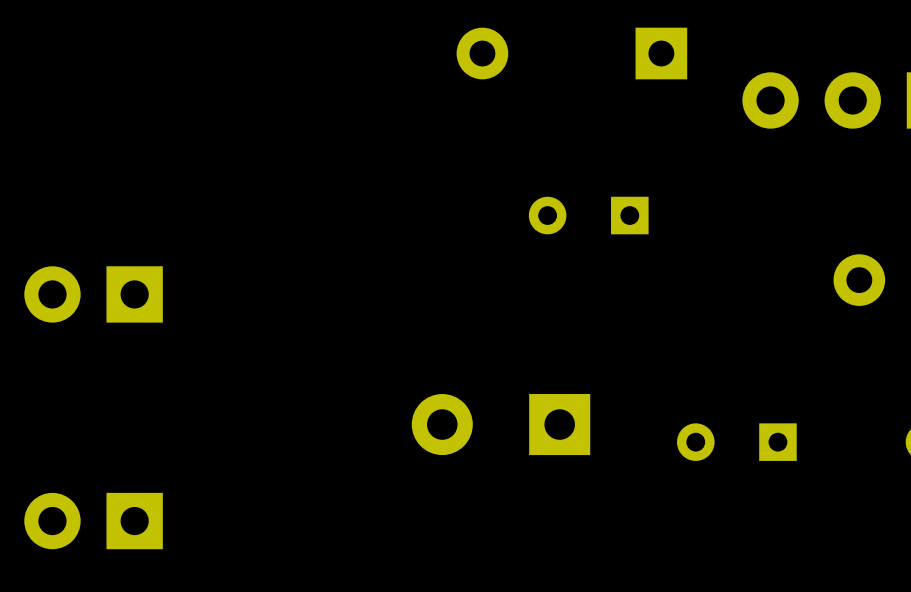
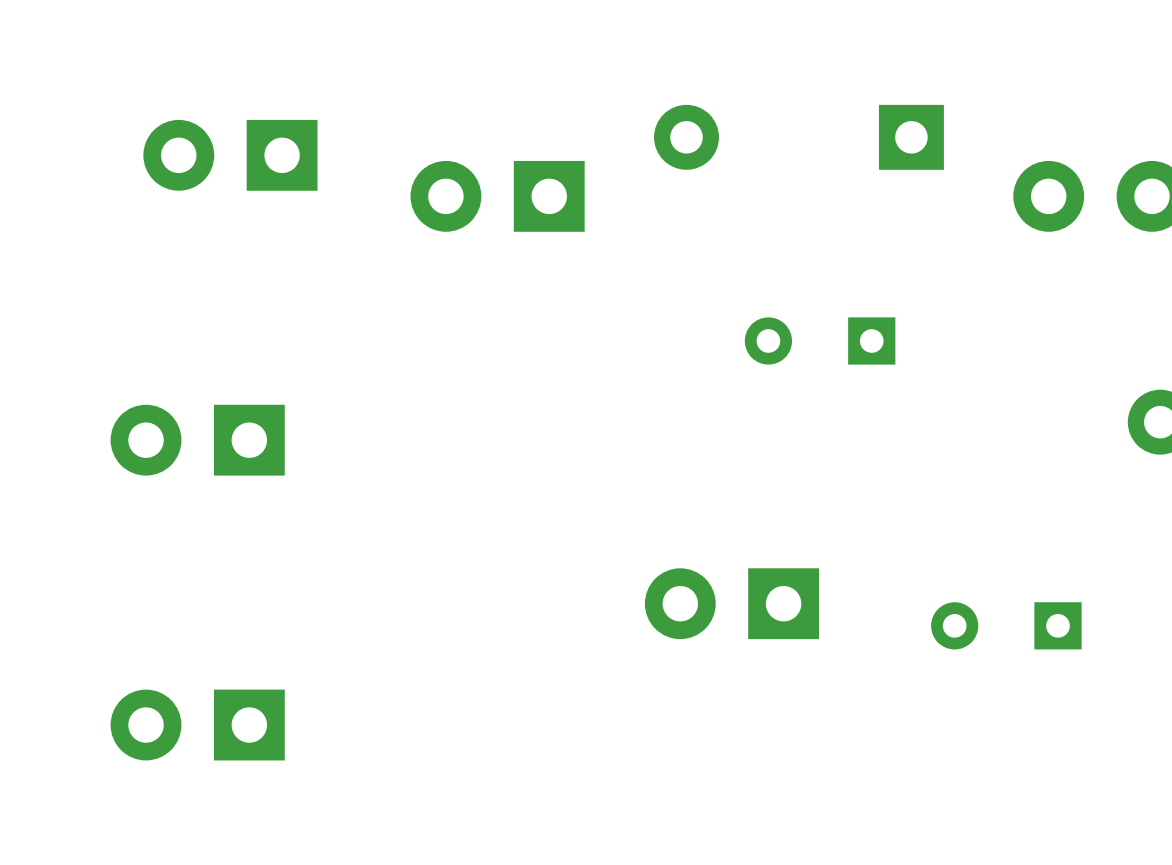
part: none -> (230, 155)
part: none -> (497, 196)
part footprint: [411, 394, 591, 456] -> [644, 568, 820, 640]

